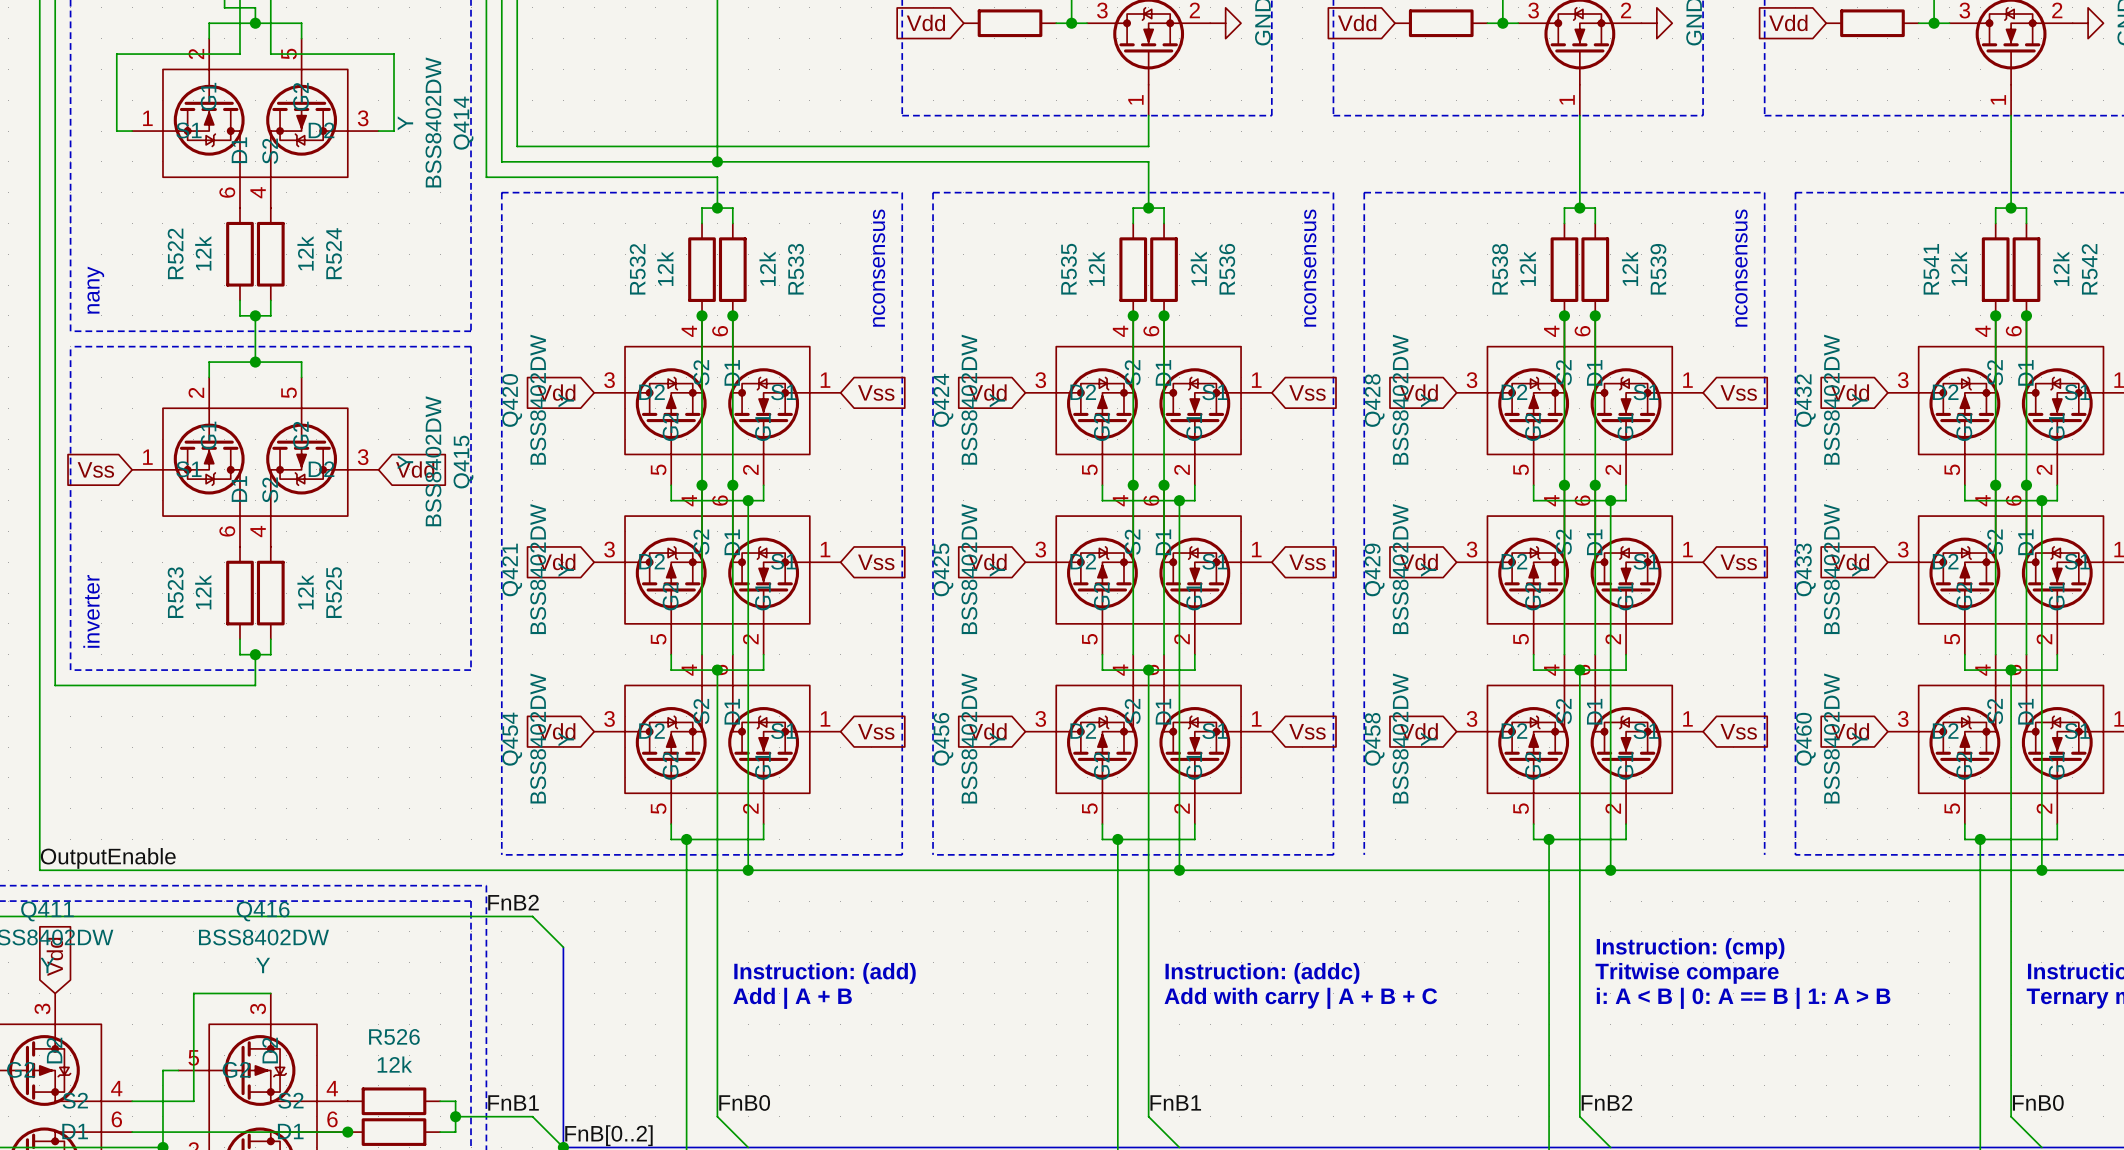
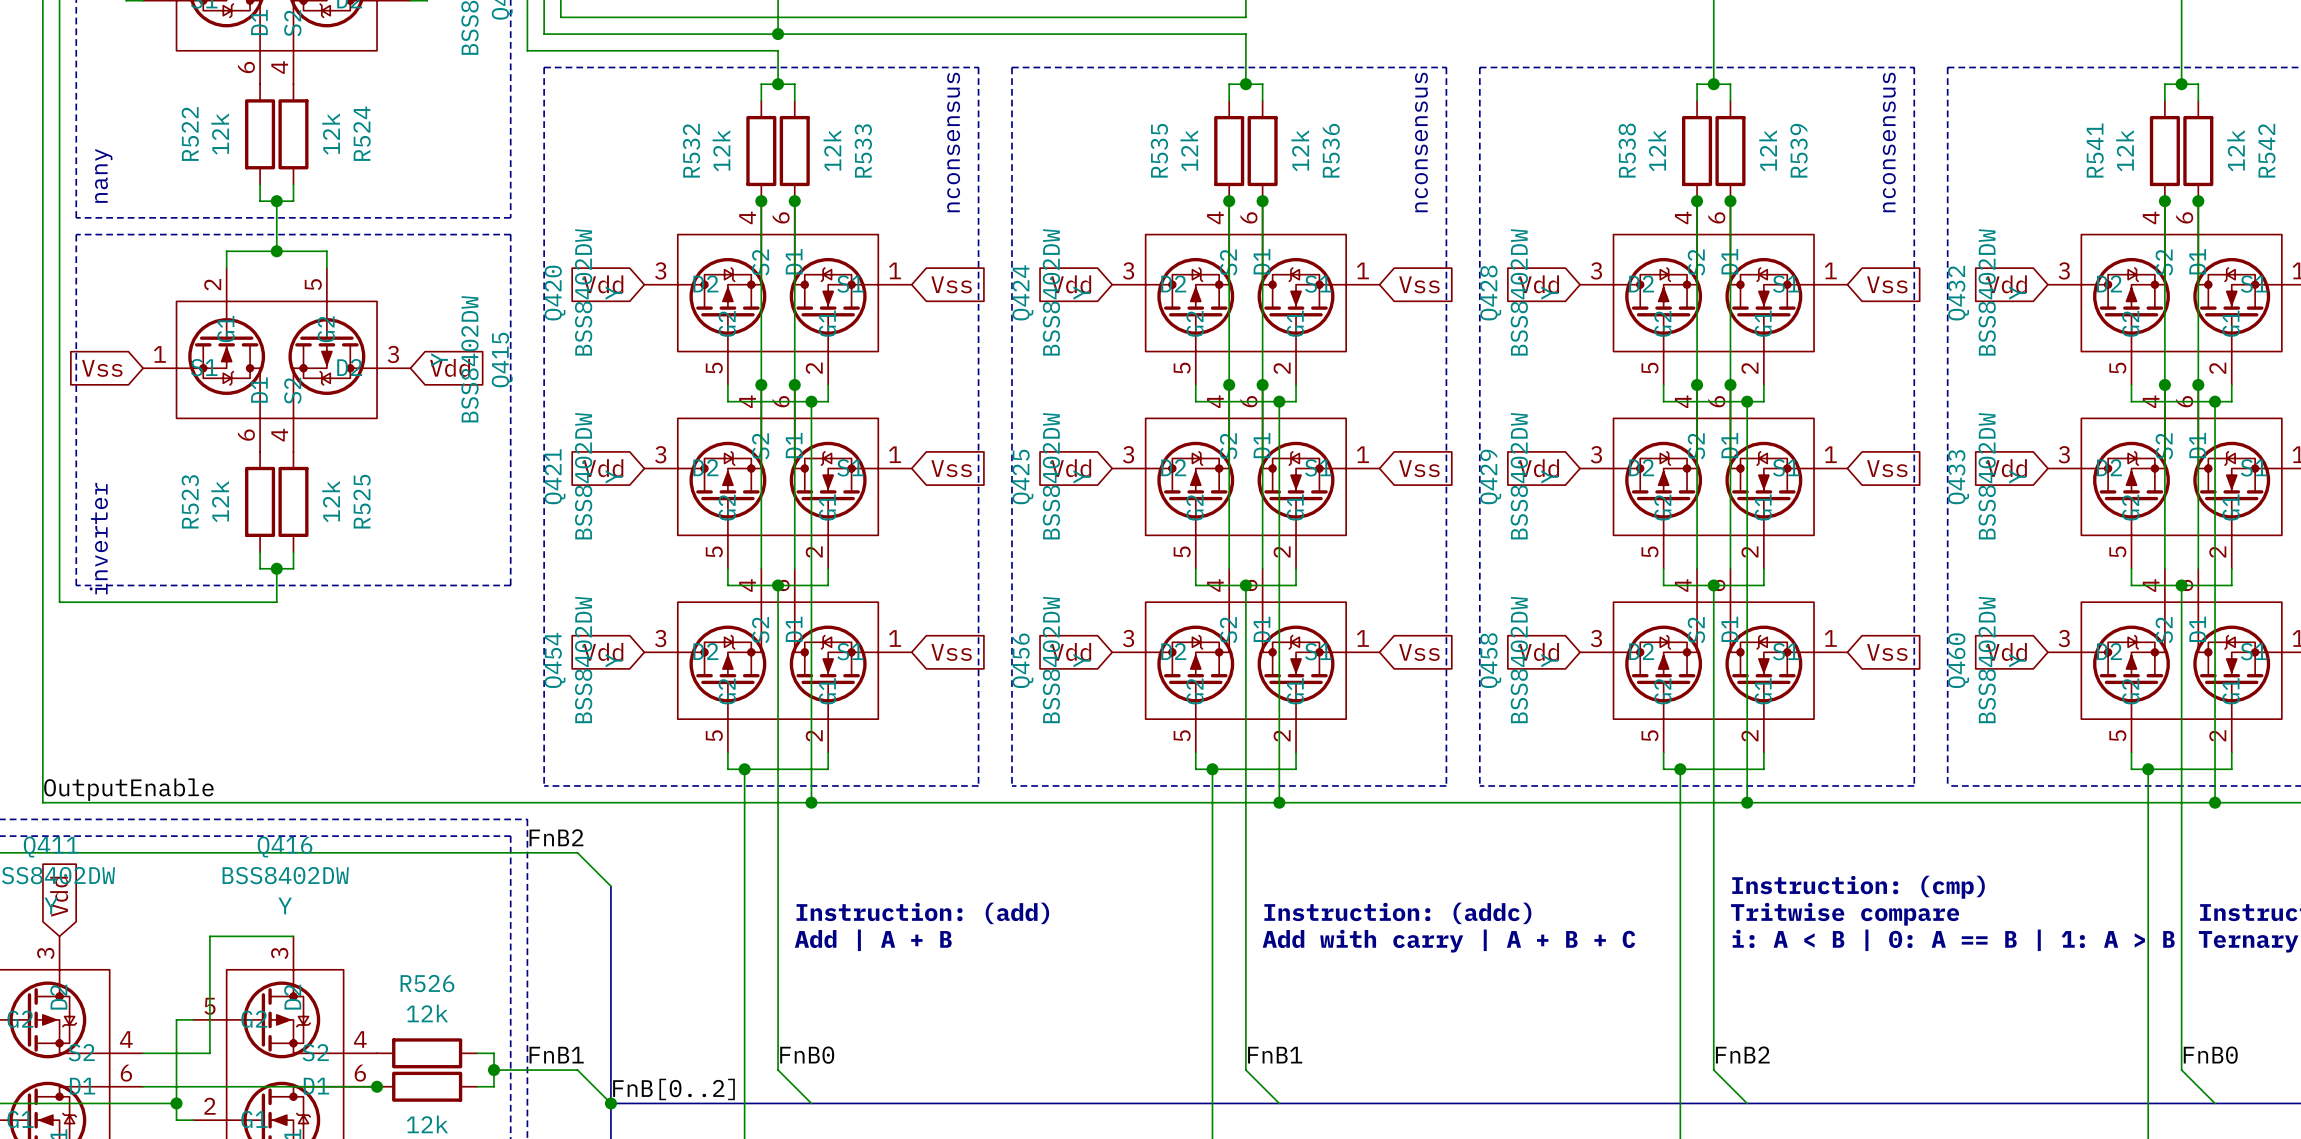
line: none -> (1479, 785) (1914, 785)

